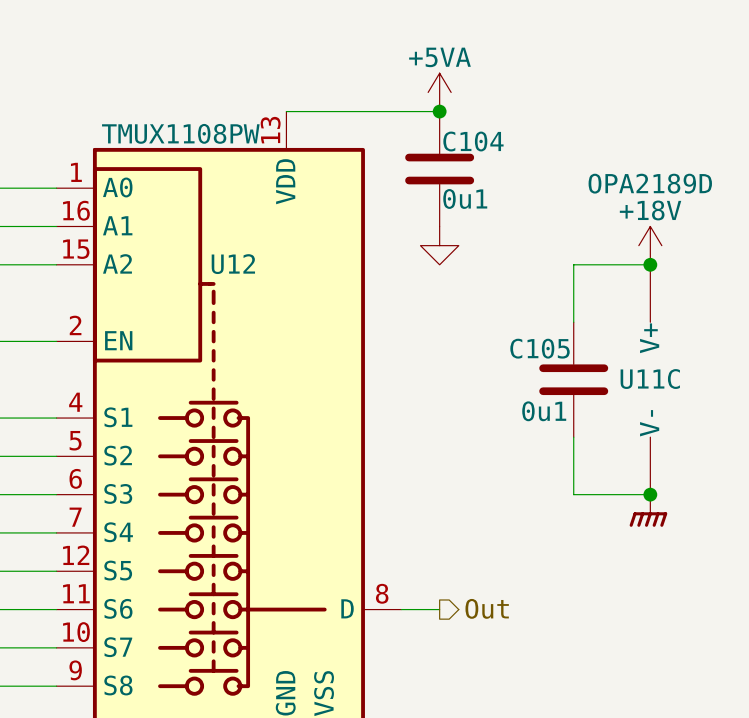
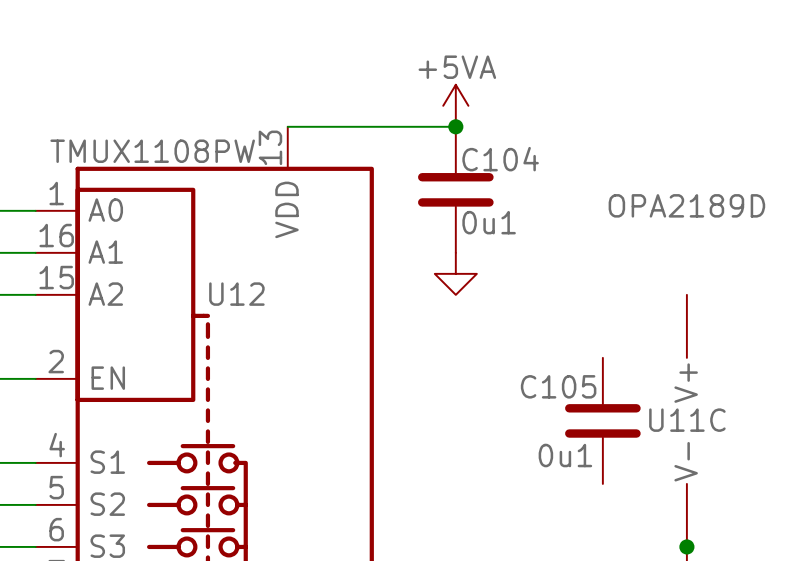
power symbol: +18V (650, 245) -> none
wire: (650, 264) (573, 264) (573, 322) -> none
junction: (650, 264) -> none
wire: (573, 437) (573, 494) (650, 494) -> none

